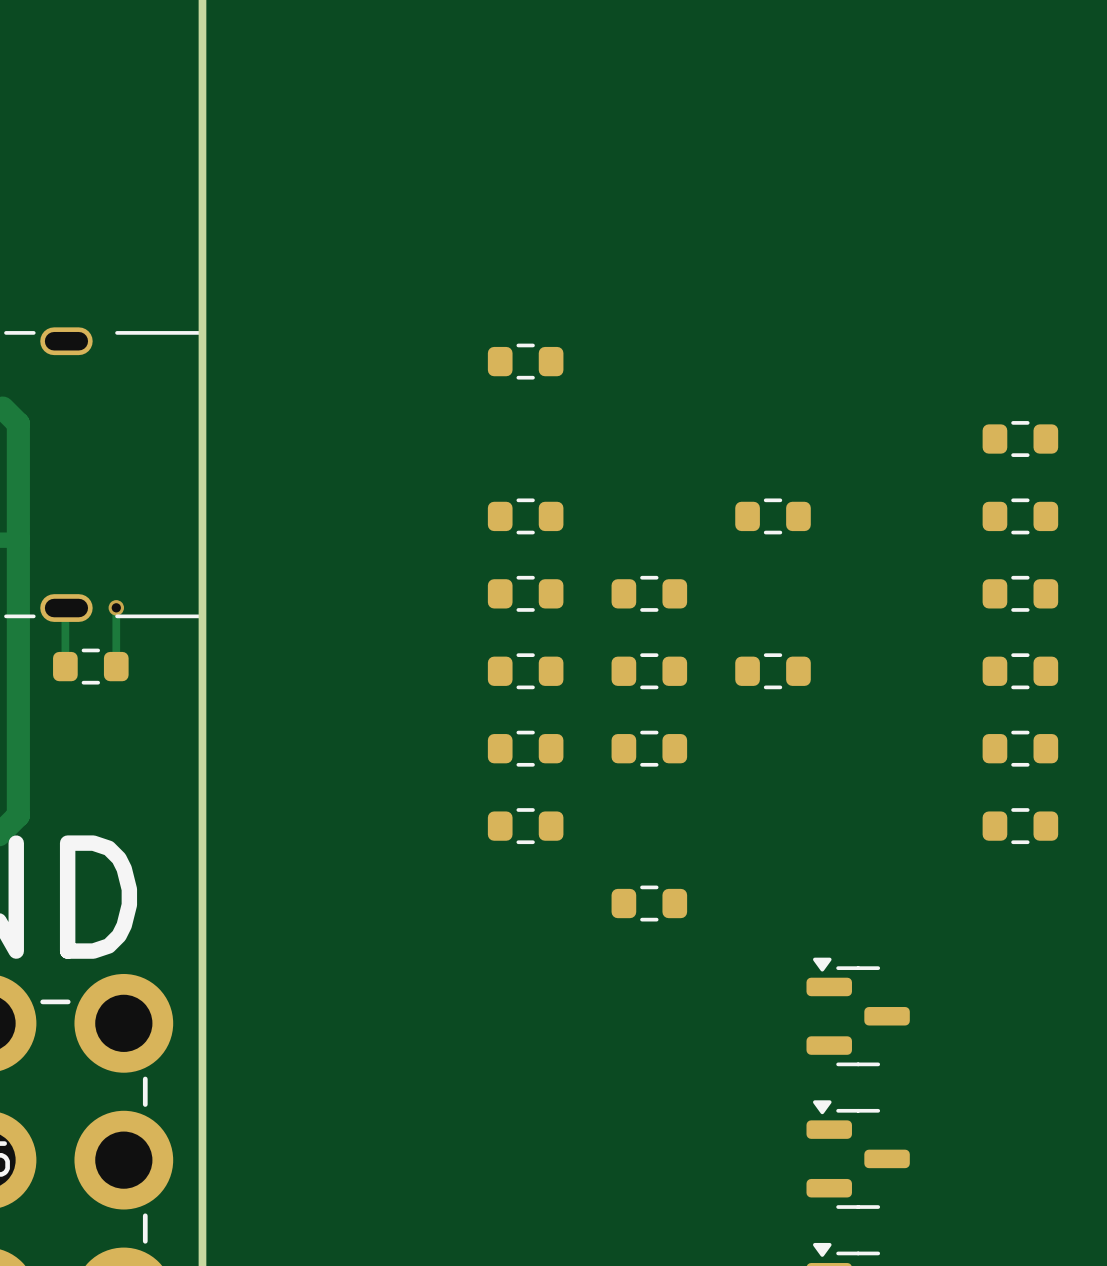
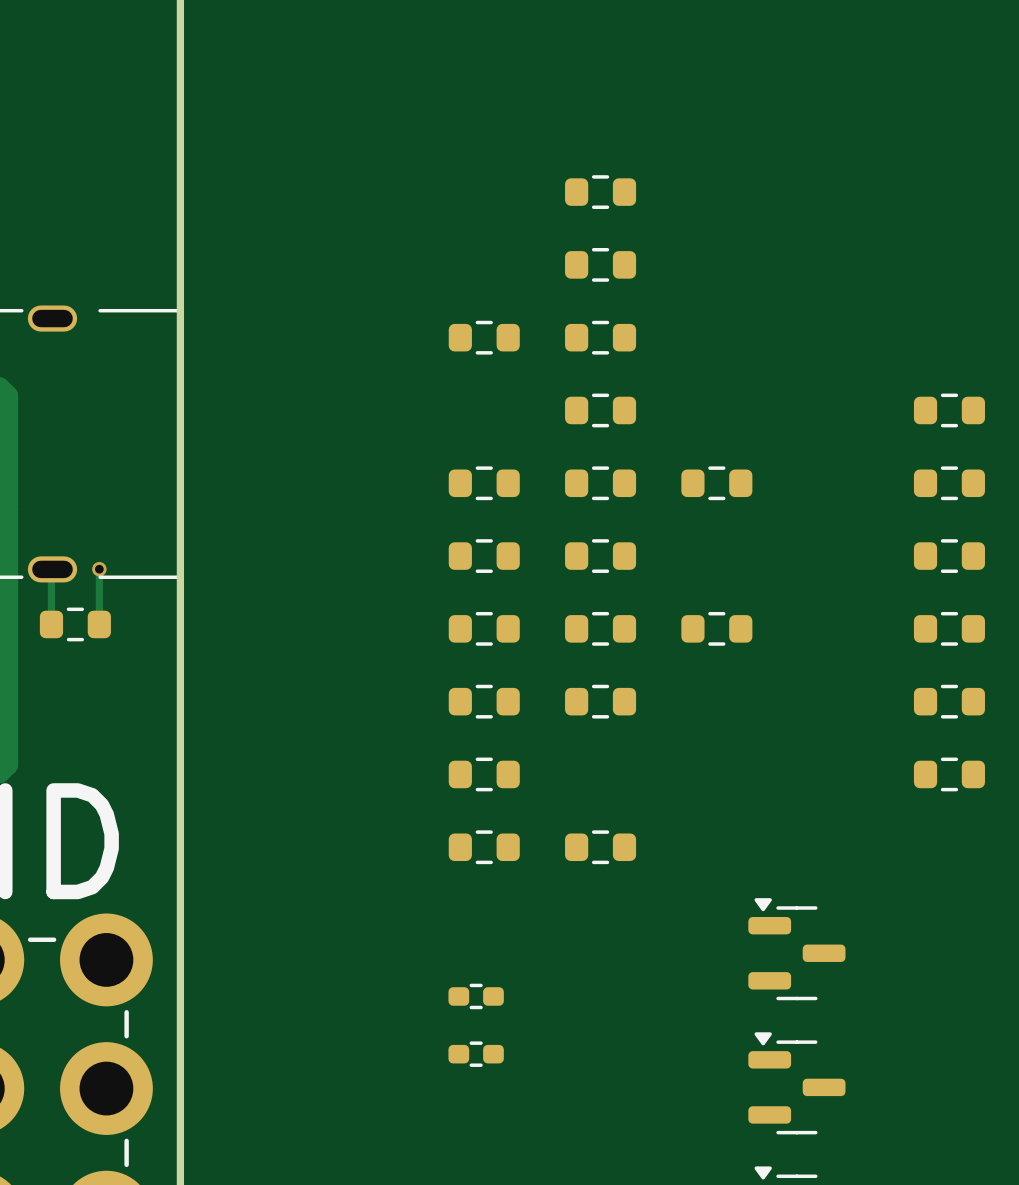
part: none -> (600, 192)
part: none -> (600, 264)
part: none -> (600, 337)
part: none -> (600, 410)
part: none -> (600, 483)
part: none -> (484, 847)
part: none -> (476, 996)
part: none -> (476, 1054)

